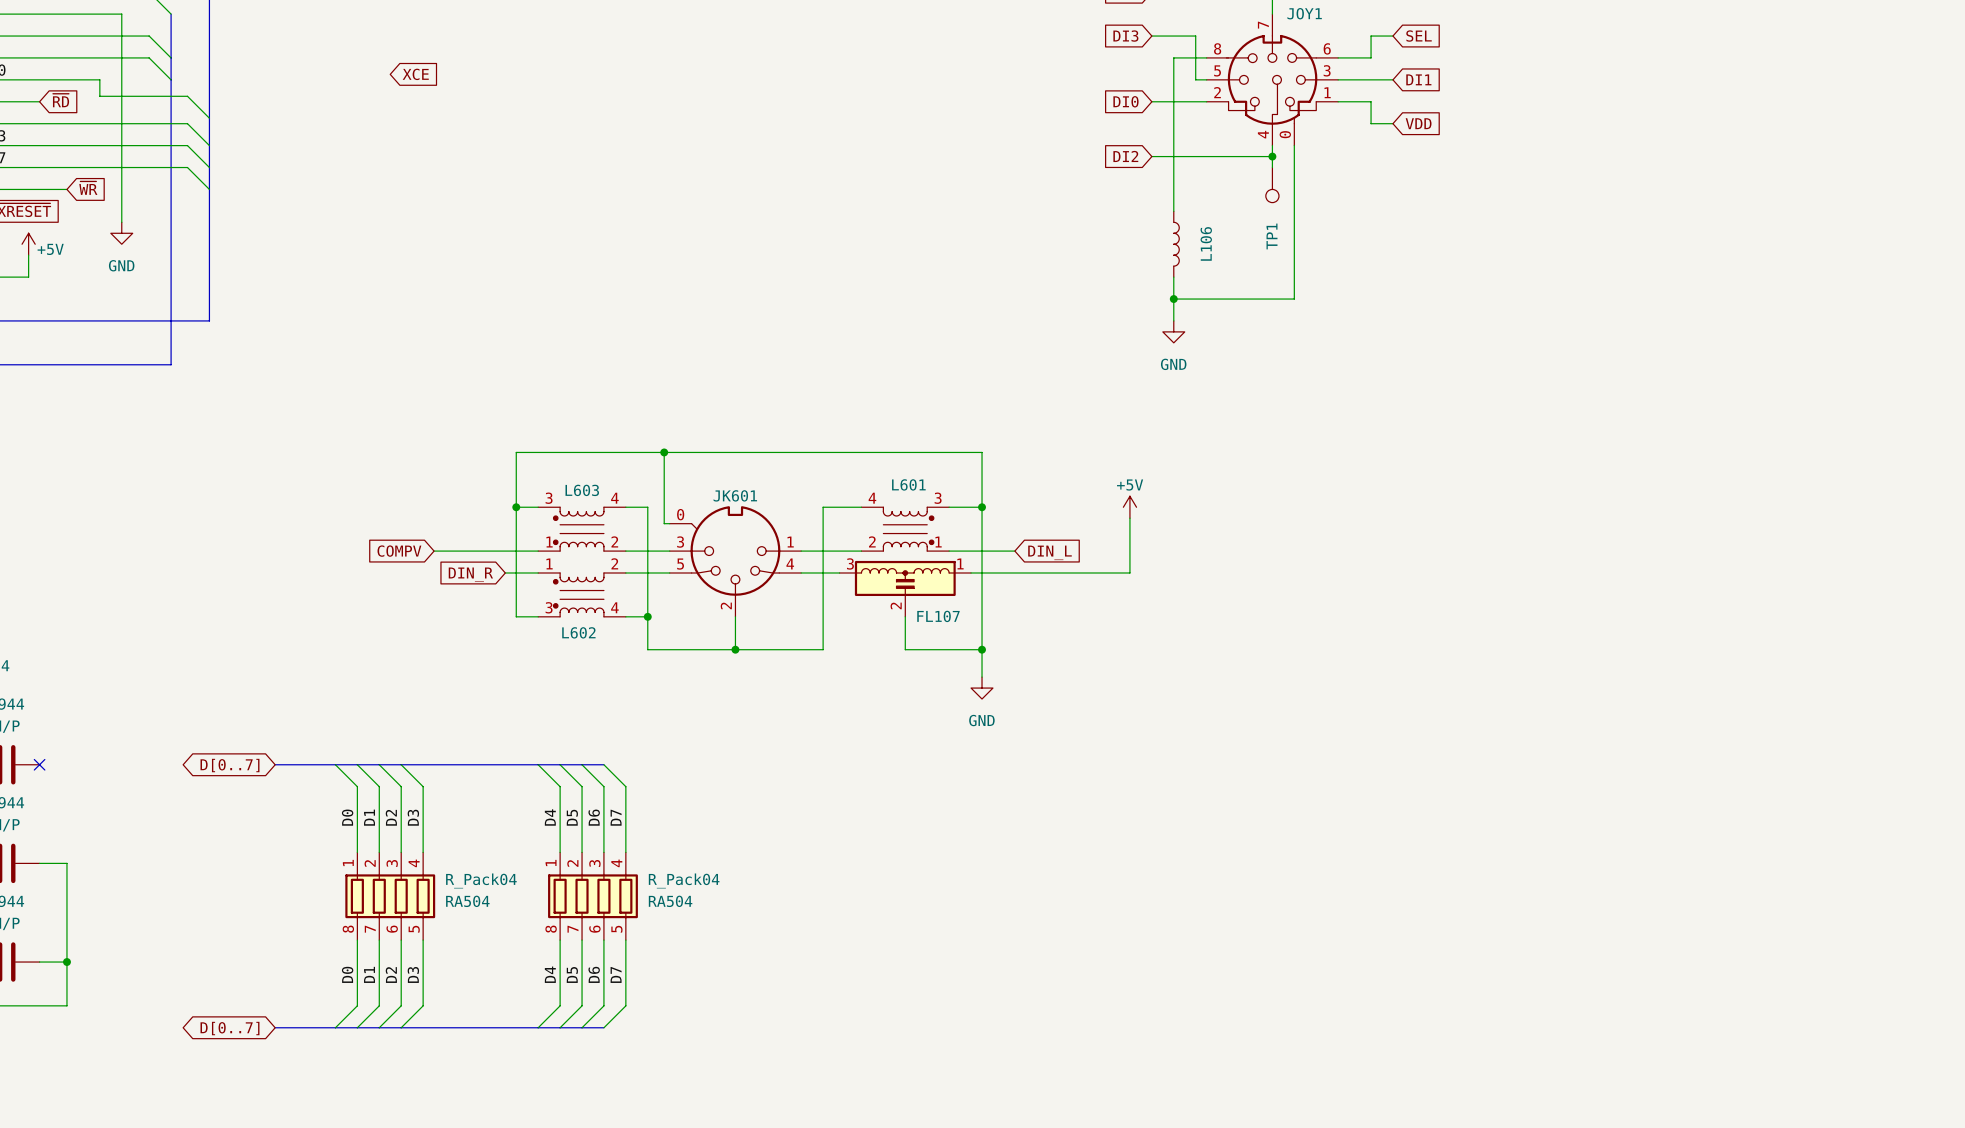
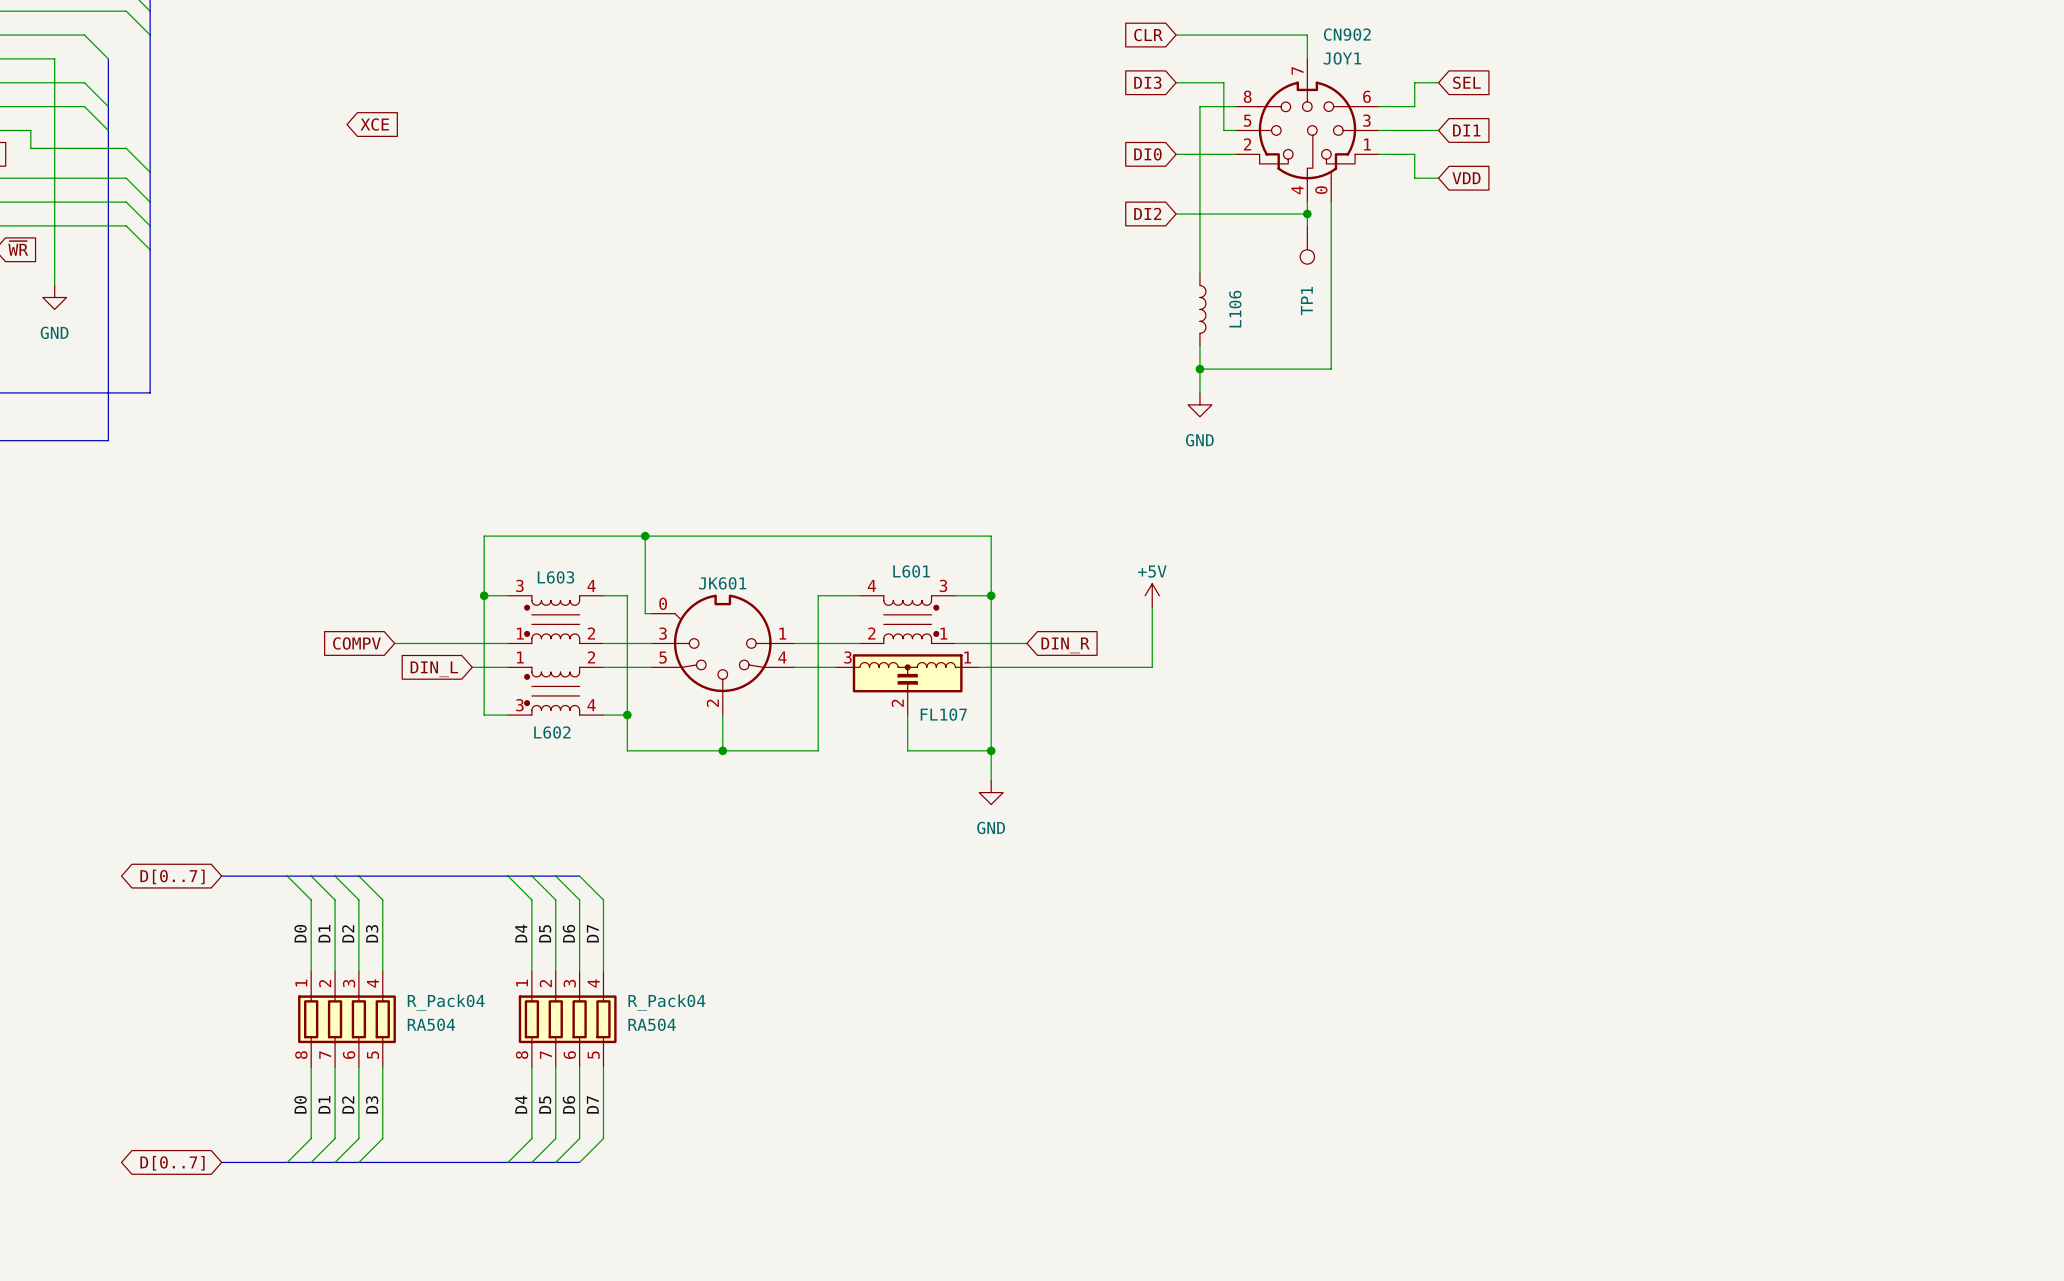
global label: DIN_L (1049, 552) -> DIN_R (1065, 645)
global label: DIN_R (470, 574) -> DIN_L (434, 669)

